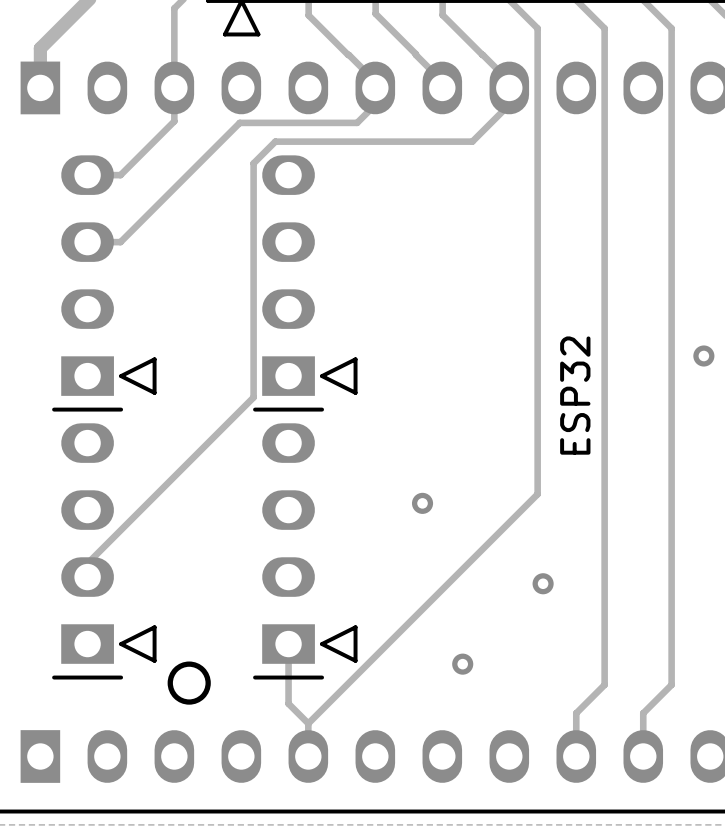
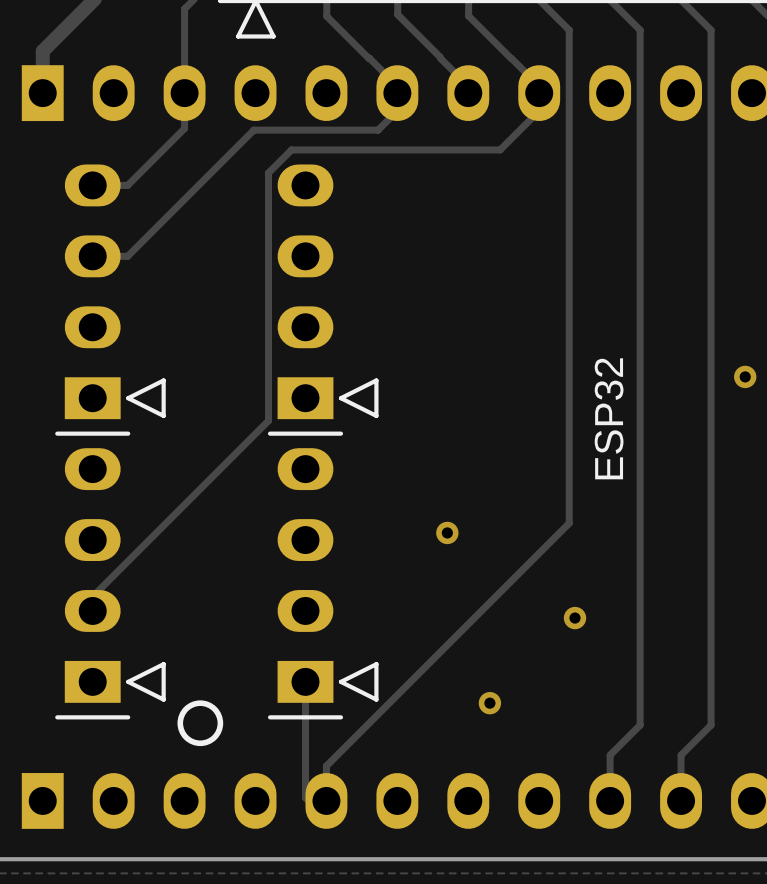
track: (288, 703) (308, 723) -> (305, 745) (305, 797) (321, 813) (331, 813) (335, 809)

